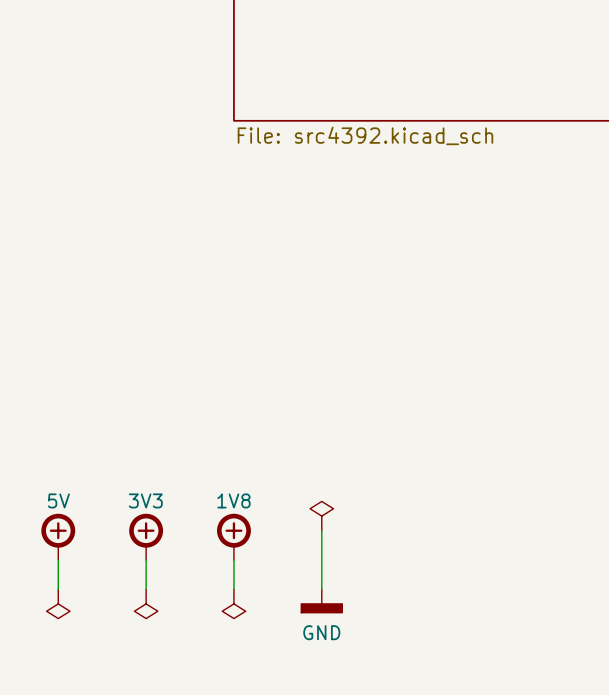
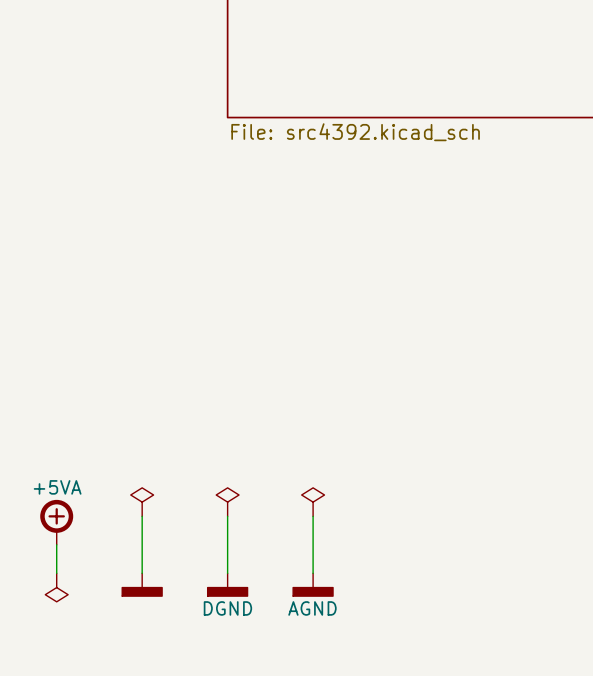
power symbol text: 5V (58, 500) -> +5VA (57, 487)
power symbol: none -> (142, 502)
power symbol: none -> (227, 502)
power symbol: (146, 536) -> none
power symbol: (233, 536) -> none
power symbol shape: [134, 589, 158, 619] -> [122, 573, 163, 597]
power symbol shape: [222, 589, 246, 619] -> [207, 573, 248, 597]
power symbol text: none -> DGND (227, 608)
power symbol text: GND (321, 632) -> AGND (312, 608)

